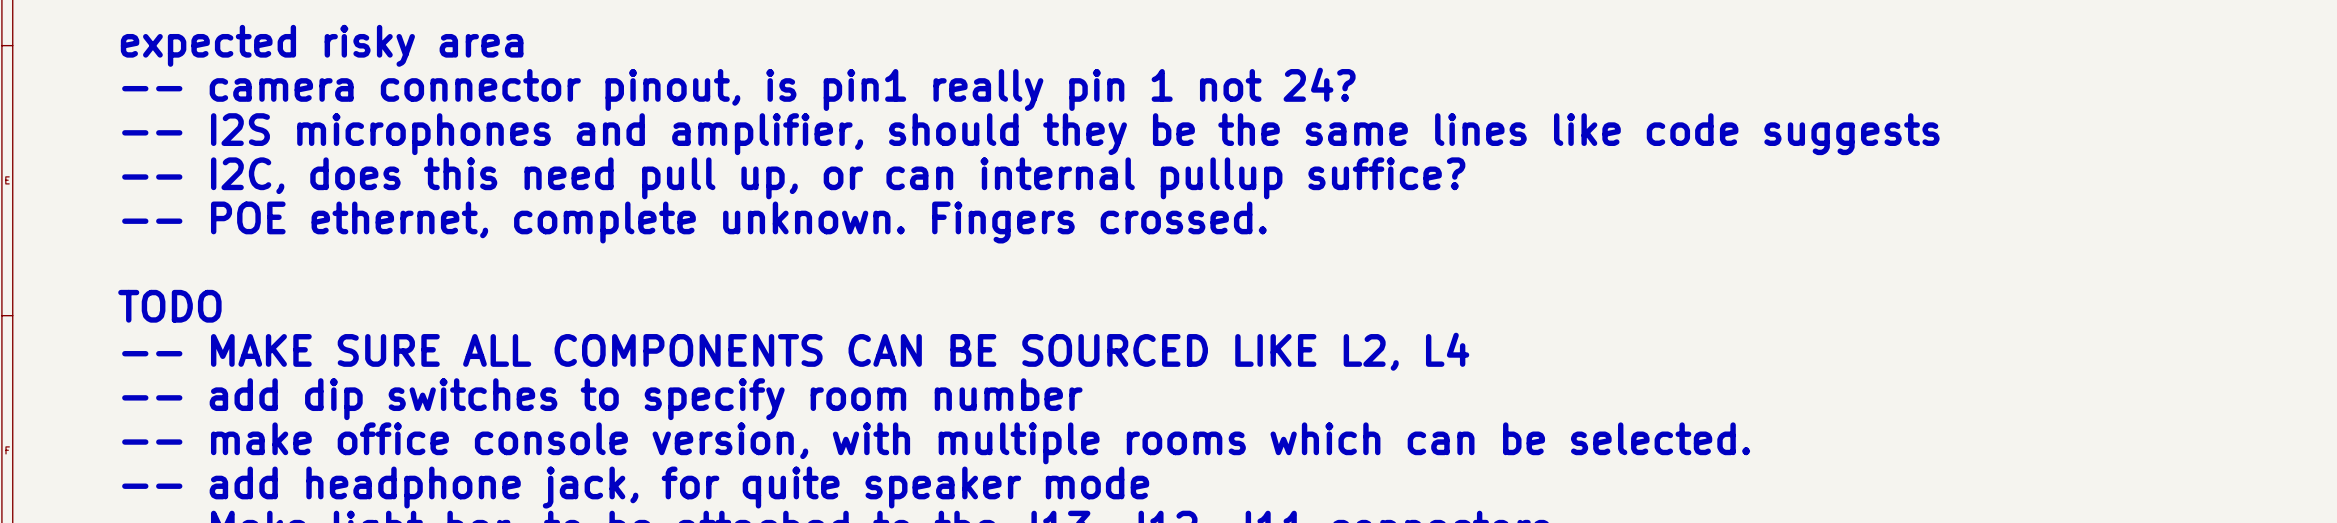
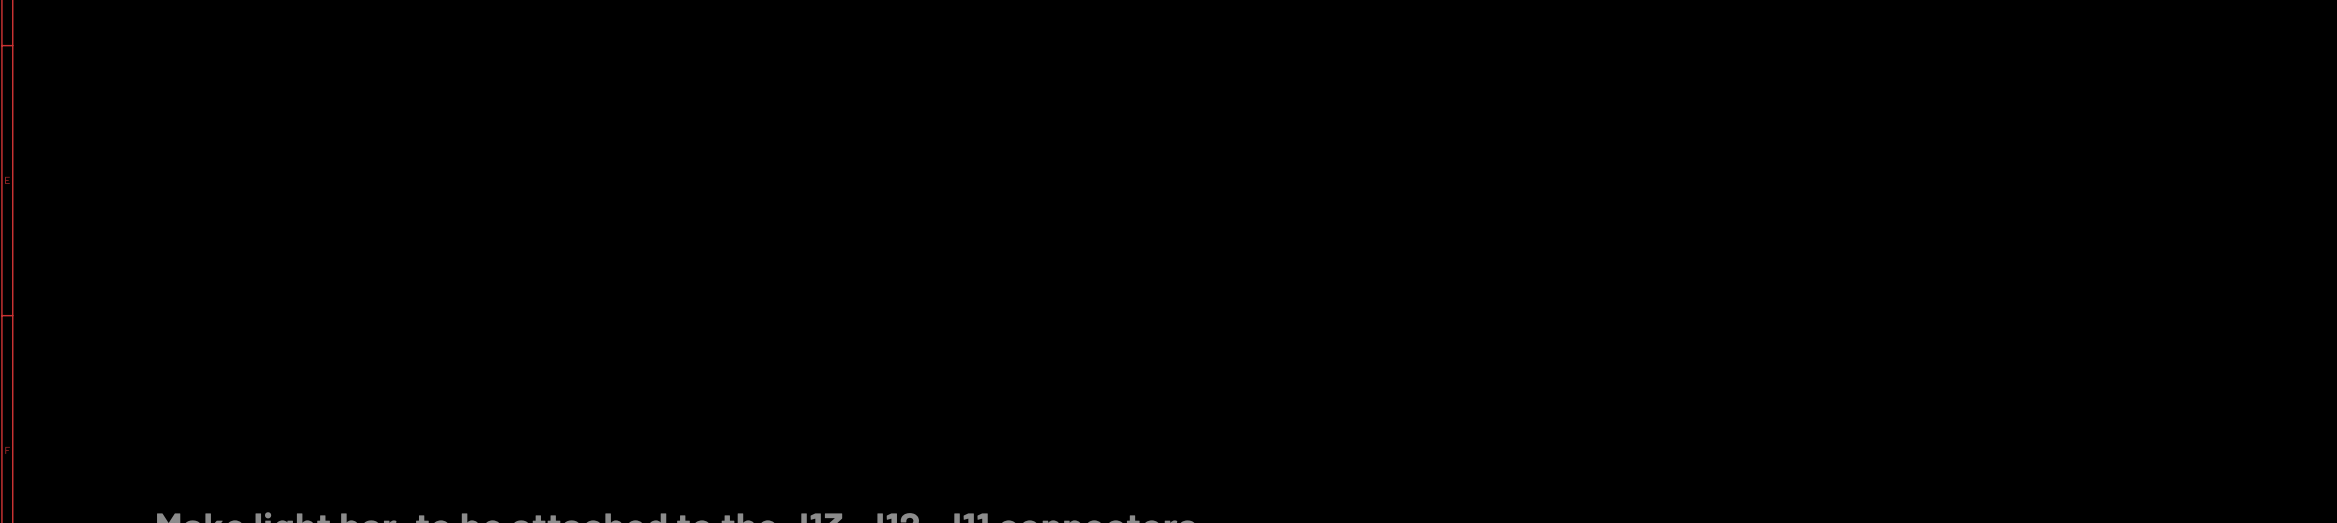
text: expected risky area (322, 45) -> none
text: -- camera connector pinout, is pin1 really pin 1 not 24? (738, 89) -> none
text: -- I2S microphones and amplifier, should they be the same lines like code suggests (1030, 134) -> none
text: -- I2C, does this need pull up, or can internal pullup suffice? (793, 178) -> none
text: -- POE ethernet, complete unknown. Fingers crossed. (694, 222) -> none
text: TODO (169, 306) -> none
text: -- MAKE SURE ALL COMPONENTS CAN BE SOURCED LIKE L2, L4 (795, 351) -> none
text: -- add dip switches to specify room number (602, 399) -> none
text: -- make office console version, with multiple rooms which can be selected. (936, 443) -> none
text: -- add headphone jack, for quite speaker mode (635, 487) -> none

